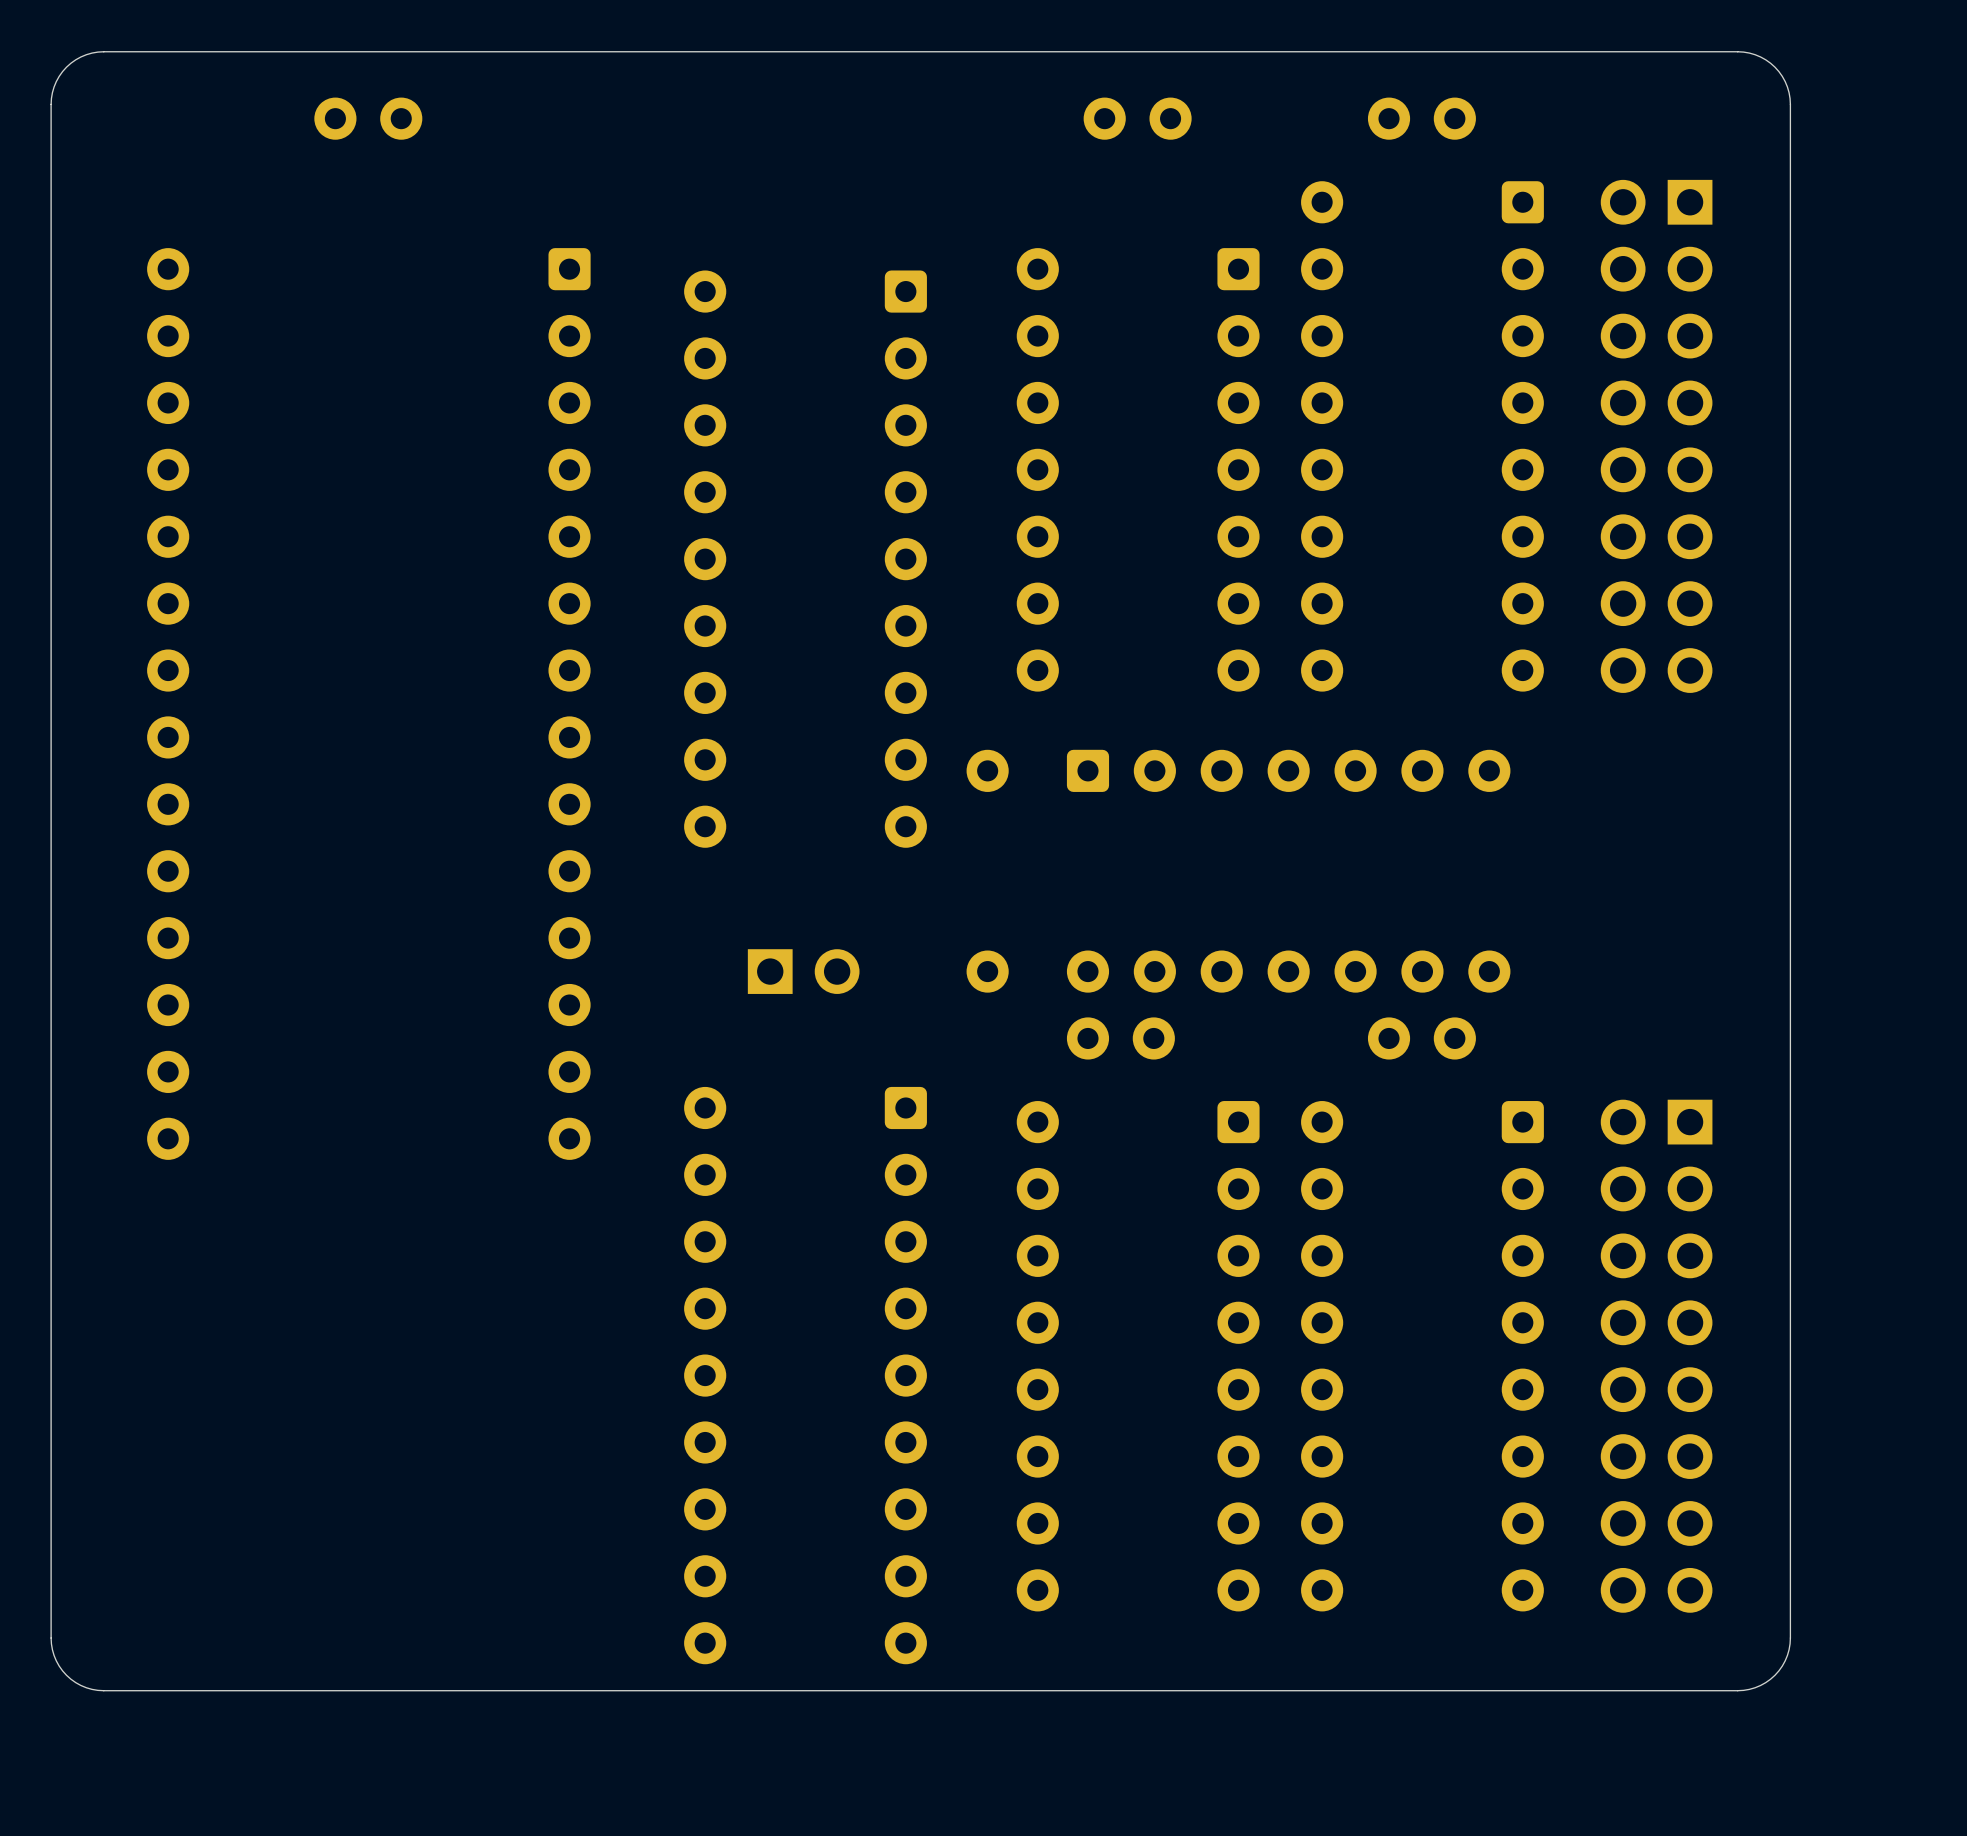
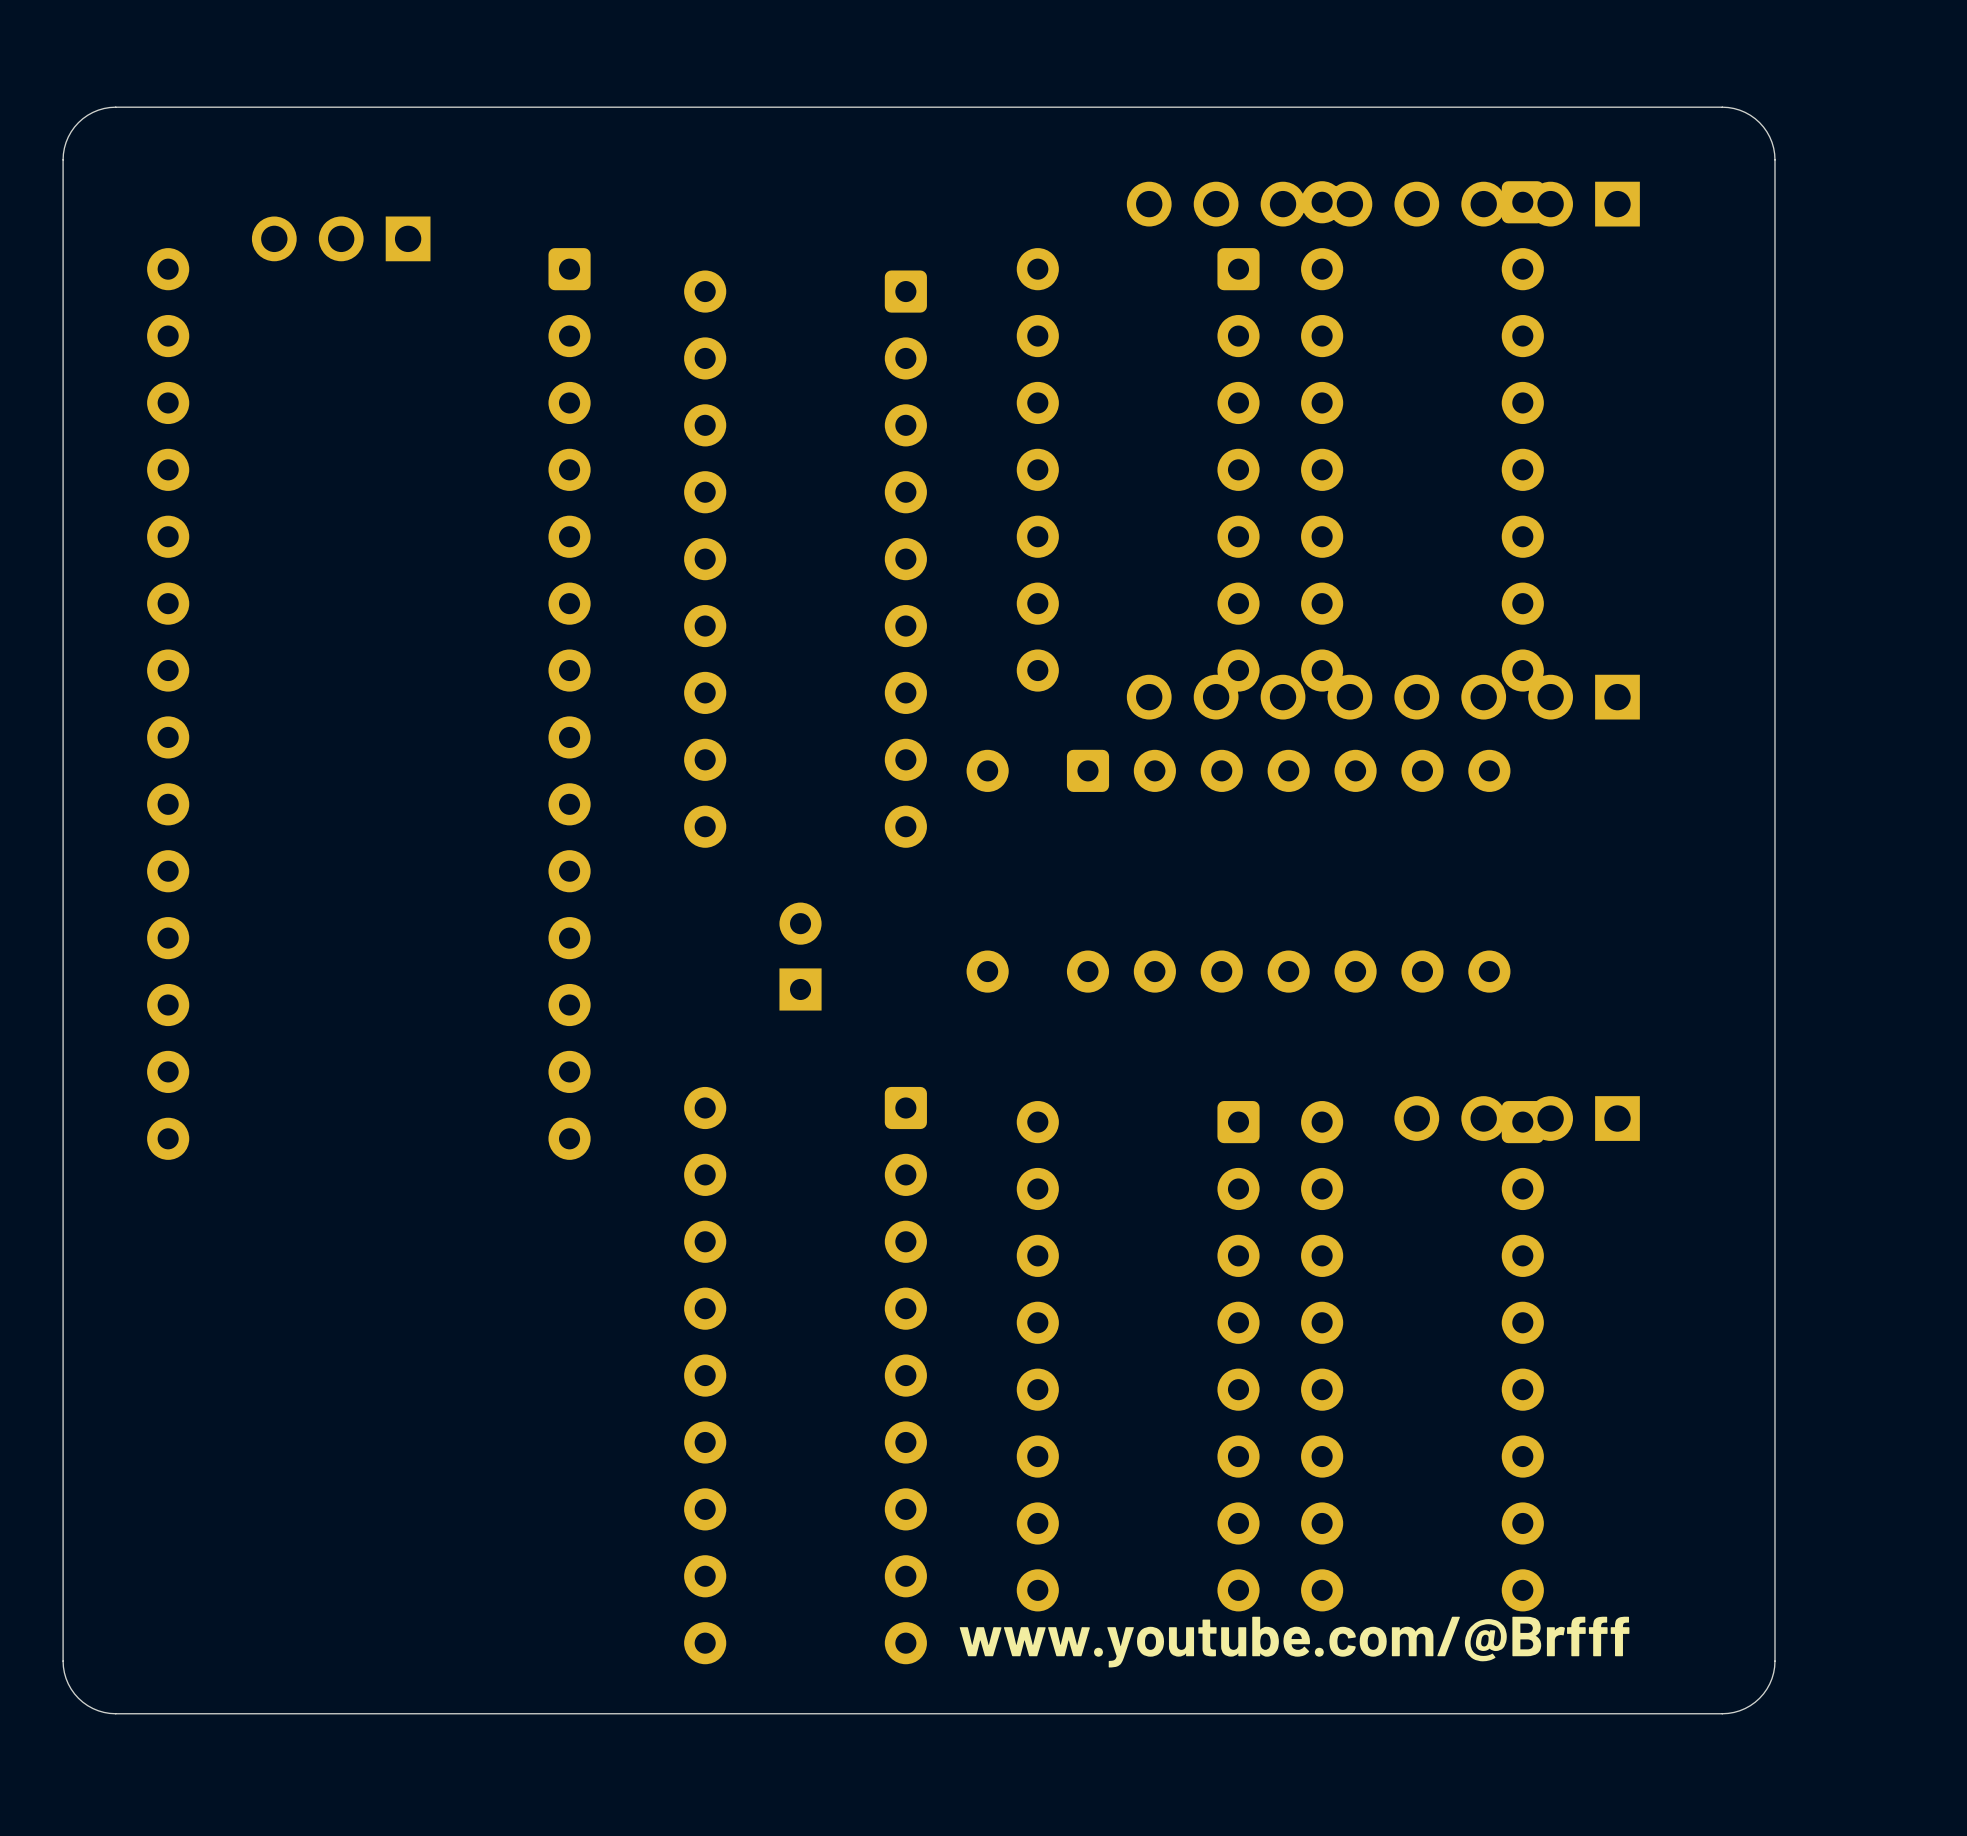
board edge: (1737, 51) (103, 51) (86, 54) (66, 67) (54, 87) (51, 104) (51, 1638) (54, 1655) (66, 1675) (86, 1687) (103, 1690) (1737, 1690) (1755, 1687) (1774, 1675) (1787, 1655) (1790, 1638) (1790, 104) (1787, 87) (1774, 67) (1755, 54) (1737, 51) -> (1722, 107) (1745, 112) (1759, 122) (1772, 142) (1774, 159) (1774, 1661) (1772, 1678) (1759, 1698) (1739, 1710) (1722, 1713) (115, 1713) (98, 1710) (78, 1698) (66, 1678) (63, 1661) (63, 159) (66, 142) (78, 122) (92, 112) (115, 107) (1722, 107)
part: (368, 118) -> none
part: (1137, 118) -> none
part: (1421, 118) -> none
part: none -> (1383, 204)
part: none -> (341, 238)
part: (1656, 436) -> none
part: none -> (1383, 697)
part footprint: [747, 949, 860, 994] -> [779, 902, 822, 1011]
part: (1120, 1038) -> none
part: (1421, 1038) -> none
part: none -> (1517, 1118)
part: (1656, 1356) -> none
text: none -> www.youtube.com/@Brfff (1294, 1642)

